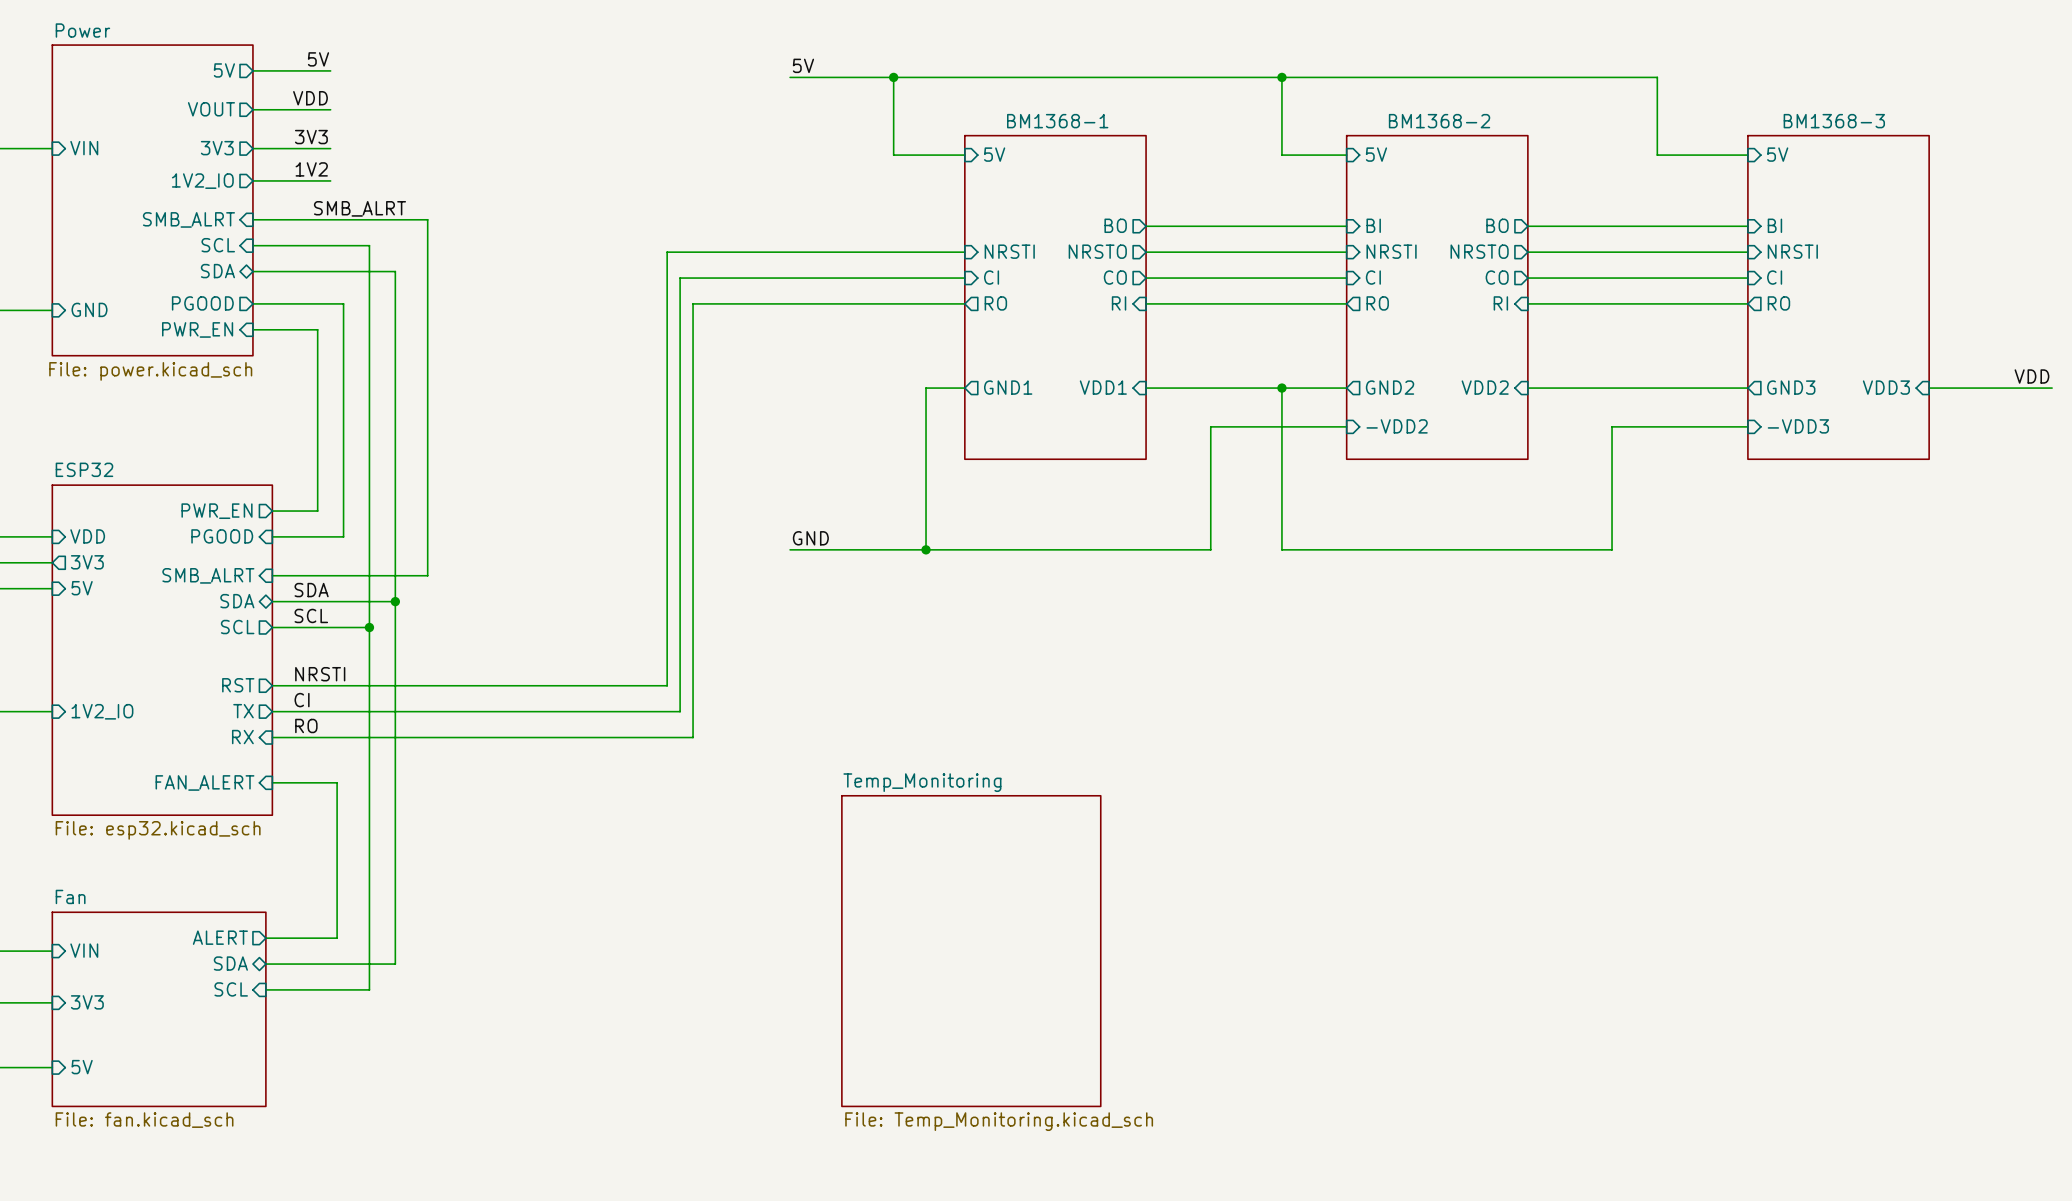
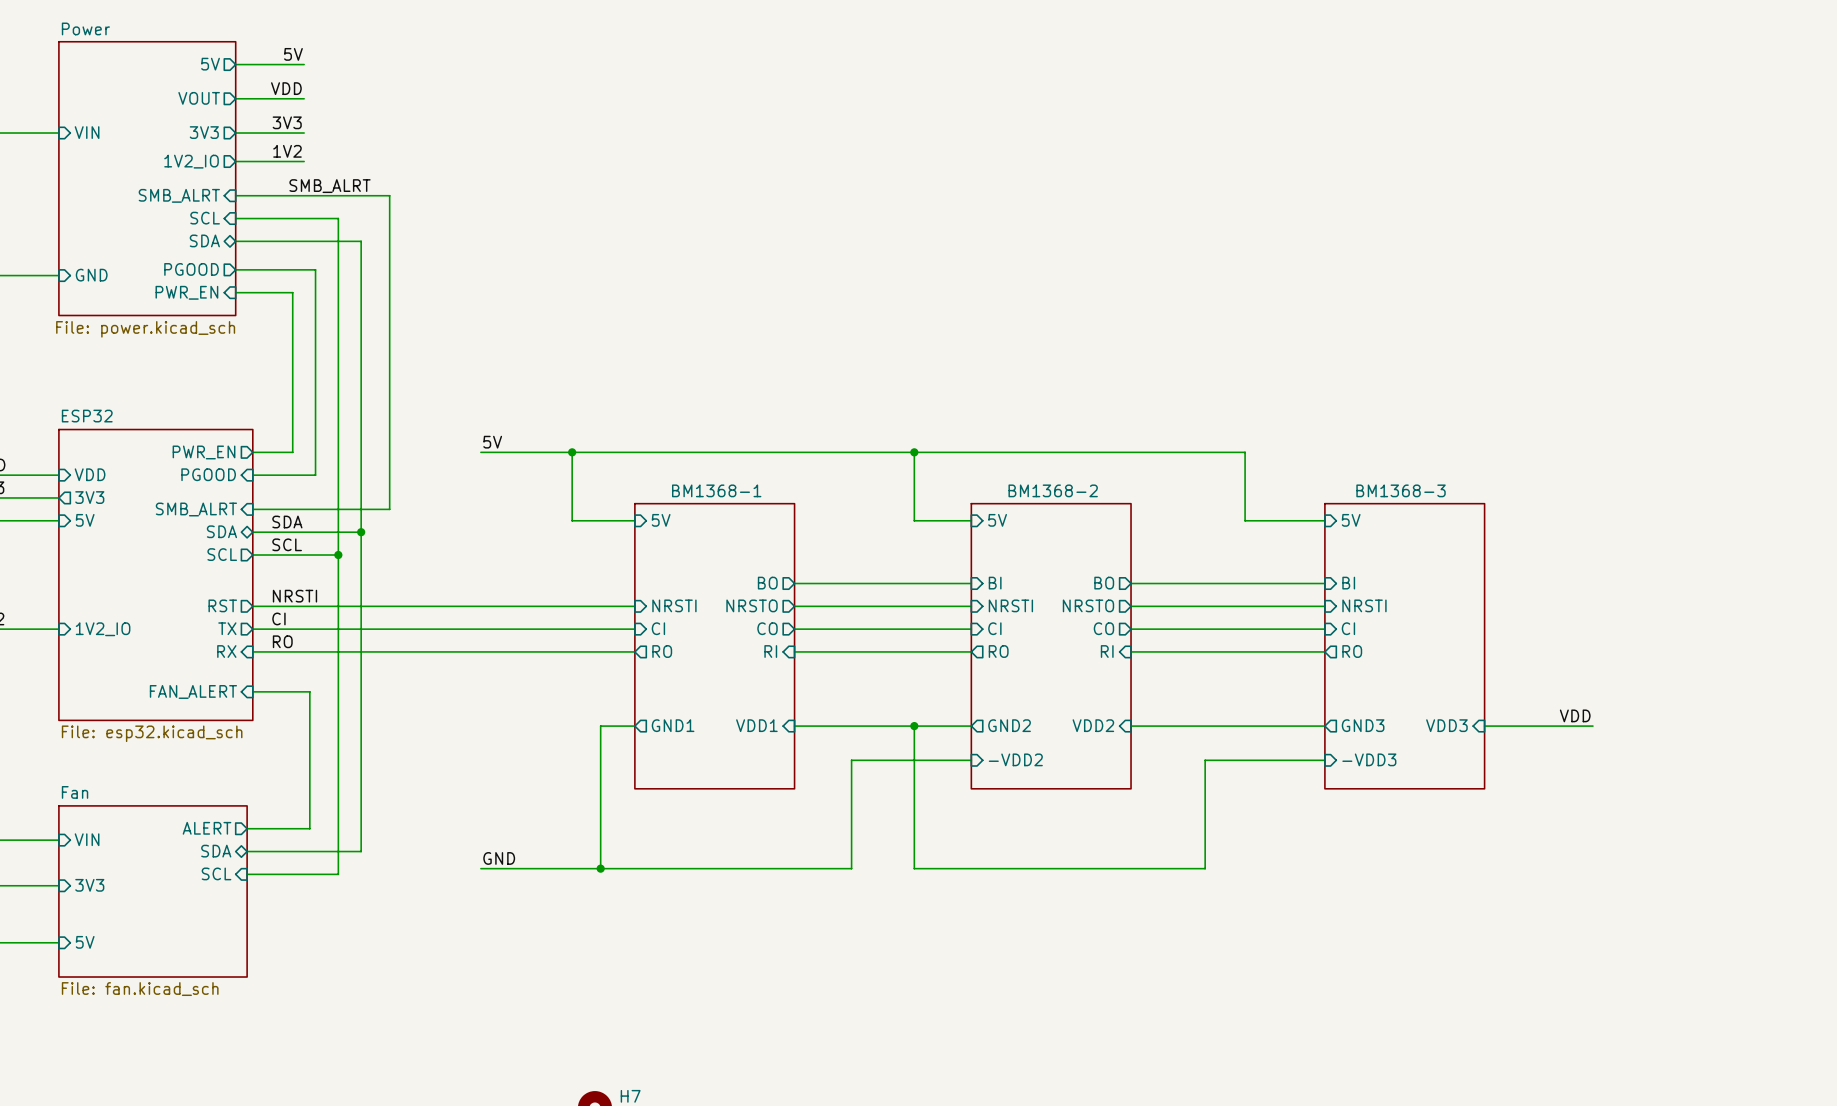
label: 5V (803, 65) -> none
wire: (790, 77) (1657, 77) (1657, 155) (1747, 155) -> none
wire: (893, 77) (893, 155) (964, 155) -> none
junction: (893, 77) -> none
wire: (1281, 77) (1281, 155) (1346, 155) -> none
junction: (1281, 77) -> none
sheet pin: 5V (994, 154) -> none
sheet pin: 5V (1376, 154) -> none
sheet pin: 5V (1777, 154) -> none
sheet pin: BO (1115, 225) -> none
sheet pin: BI (1373, 225) -> none
sheet pin: BO (1497, 225) -> none
sheet pin: BI (1774, 225) -> none
wire: (1146, 226) (1346, 226) -> none
wire: (1527, 226) (1747, 226) -> none
sheet pin: NRSTI (1009, 251) -> none
sheet pin: NRSTO (1097, 251) -> none
sheet pin: NRSTI (1391, 251) -> none
sheet pin: NRSTO (1479, 251) -> none
sheet pin: NRSTI (1792, 251) -> none
wire: (964, 252) (667, 252) (667, 685) -> (634, 606) (600, 606)
wire: (1146, 252) (1346, 252) -> none
wire: (1527, 252) (1747, 252) -> none
sheet pin: CI (991, 277) -> none
sheet pin: CO (1115, 277) -> none
sheet pin: CI (1373, 277) -> none
sheet pin: CO (1497, 277) -> none
sheet pin: CI (1774, 277) -> none
wire: (964, 278) (680, 278) (680, 711) -> (634, 629) (612, 629)
wire: (1146, 278) (1346, 278) -> none
wire: (1527, 278) (1747, 278) -> none
sheet BM1368-1 position: (1055, 297) -> (714, 646)
sheet BM1368-2 position: (1437, 297) -> (1051, 646)
sheet BM1368-3 position: (1838, 297) -> (1404, 646)
wire: (964, 303) (693, 303) (693, 737) -> (634, 651) (623, 651)
sheet pin: RO (995, 303) -> none
sheet pin: RI (1119, 303) -> none
wire: (1146, 303) (1346, 303) -> none
sheet pin: RO (1377, 303) -> none
sheet pin: RI (1500, 303) -> none
wire: (1527, 303) (1747, 303) -> none
sheet pin: RO (1778, 303) -> none
label: VDD (2031, 376) -> none
sheet pin: GND1 (1008, 387) -> none
sheet pin: VDD1 (1103, 387) -> none
sheet pin: GND2 (1390, 387) -> none
sheet pin: VDD2 (1485, 387) -> none
sheet pin: GND3 (1791, 387) -> none
sheet pin: VDD3 (1886, 387) -> none
wire: (964, 388) (926, 388) (926, 549) -> none
wire: (1146, 388) (1346, 388) -> none
wire: (1281, 388) (1281, 549) (1612, 549) (1612, 426) (1747, 426) -> none
junction: (1281, 388) -> none
wire: (1527, 388) (1747, 388) -> none
wire: (1929, 388) (2052, 388) -> none
wire: (1346, 426) (1210, 426) (1210, 549) (790, 549) -> none
sheet pin: -VDD2 (1397, 426) -> none
sheet pin: -VDD3 (1798, 426) -> none
label: none -> 5V (492, 442)
wire: none -> (480, 452) (1245, 452) (1245, 520) (1324, 520)
wire: none -> (572, 452) (572, 520) (634, 520)
junction: none -> (572, 452)
wire: none -> (914, 452) (914, 520) (971, 520)
junction: none -> (914, 452)
label: GND (810, 538) -> none
junction: (926, 549) -> none
sheet pin: none -> 5V (661, 520)
sheet pin: none -> 5V (997, 520)
sheet pin: none -> 5V (1351, 520)
sheet pin: none -> BO (767, 583)
wire: none -> (794, 583) (971, 583)
sheet pin: none -> BI (995, 583)
sheet pin: none -> BO (1104, 583)
wire: none -> (1131, 583) (1324, 583)
sheet pin: none -> BI (1348, 583)
sheet pin: none -> NRSTI (674, 605)
sheet pin: none -> NRSTO (752, 605)
wire: none -> (794, 606) (971, 606)
sheet pin: none -> NRSTI (1010, 605)
sheet pin: none -> NRSTO (1088, 605)
wire: none -> (1131, 606) (1324, 606)
sheet pin: none -> NRSTI (1364, 605)
sheet pin: none -> CI (658, 628)
sheet pin: none -> CO (767, 628)
wire: none -> (794, 629) (971, 629)
sheet pin: none -> CI (994, 628)
sheet pin: none -> CO (1103, 628)
wire: none -> (1131, 629) (1324, 629)
sheet pin: none -> CI (1348, 628)
sheet pin: none -> RO (662, 651)
sheet pin: none -> RI (770, 651)
wire: none -> (794, 651) (971, 651)
sheet pin: none -> RO (998, 651)
sheet pin: none -> RI (1107, 651)
wire: none -> (1131, 651) (1324, 651)
sheet pin: none -> RO (1352, 651)
label: none -> VDD (1575, 715)
wire: none -> (634, 726) (600, 726) (600, 868)
sheet pin: none -> GND1 (673, 725)
sheet pin: none -> VDD1 (756, 725)
wire: none -> (794, 726) (971, 726)
wire: none -> (914, 726) (914, 868) (1205, 868) (1205, 760) (1324, 760)
junction: none -> (914, 726)
sheet pin: none -> GND2 (1009, 725)
sheet pin: none -> VDD2 (1093, 725)
wire: none -> (1131, 726) (1324, 726)
sheet pin: none -> GND3 (1363, 725)
sheet pin: none -> VDD3 (1446, 725)
wire: none -> (1484, 726) (1592, 726)
wire: none -> (971, 760) (851, 760) (851, 868) (480, 868)
sheet pin: none -> -VDD2 (1015, 759)
sheet pin: none -> -VDD3 (1369, 759)
sheet Temp_Monitoring: File: Temp_Monitoring.kicad_sch (971, 951) -> none
label: none -> GND (499, 858)
junction: none -> (600, 868)

